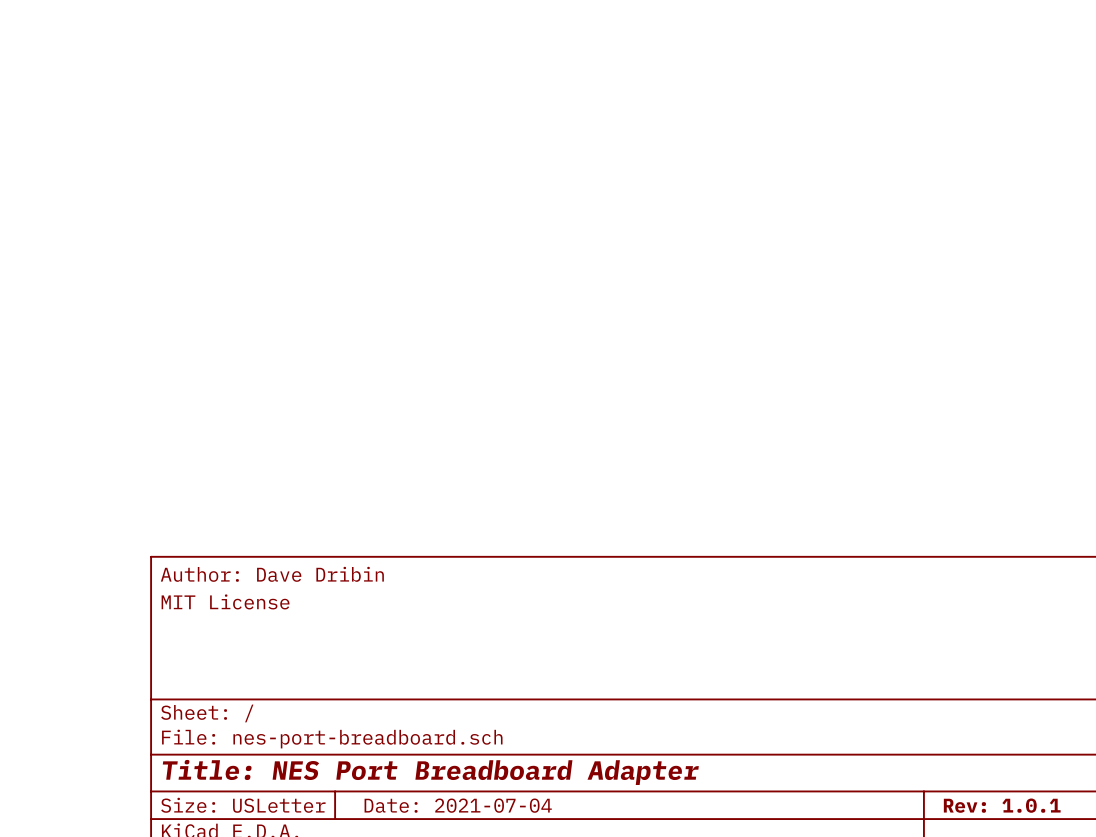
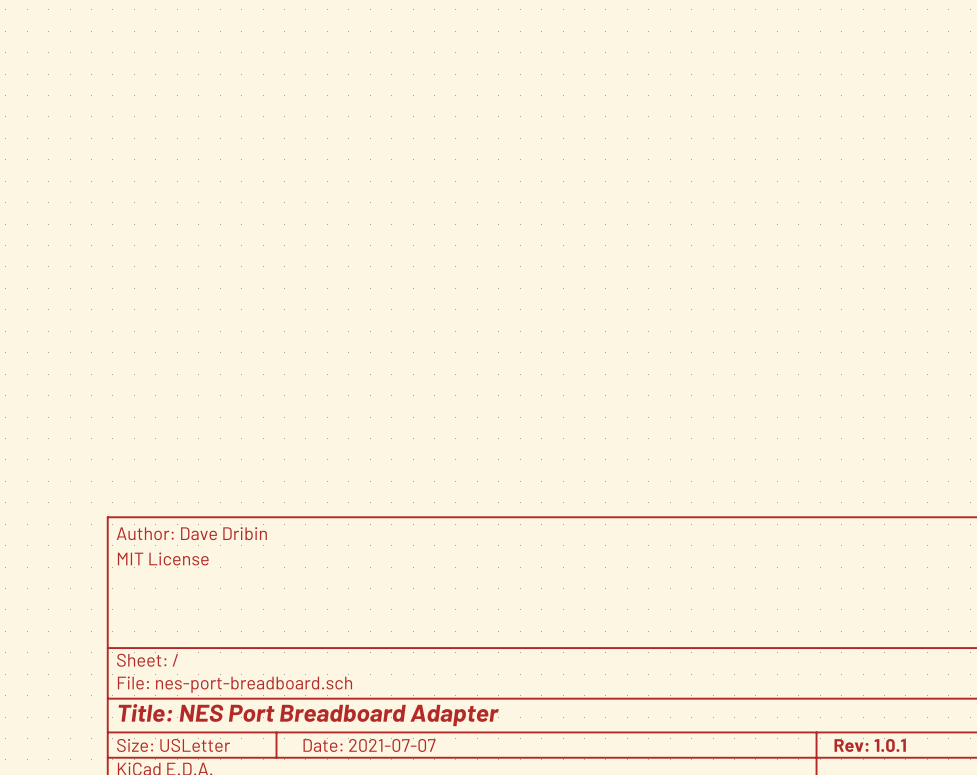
title block: Date: 2021-07-04 (458, 805) -> Date: 2021-07-07 (369, 745)

